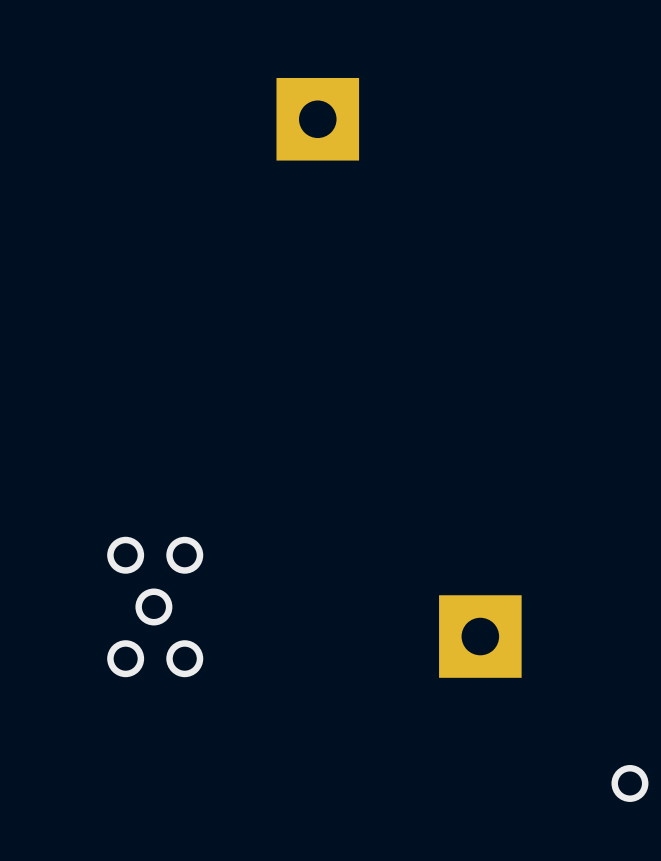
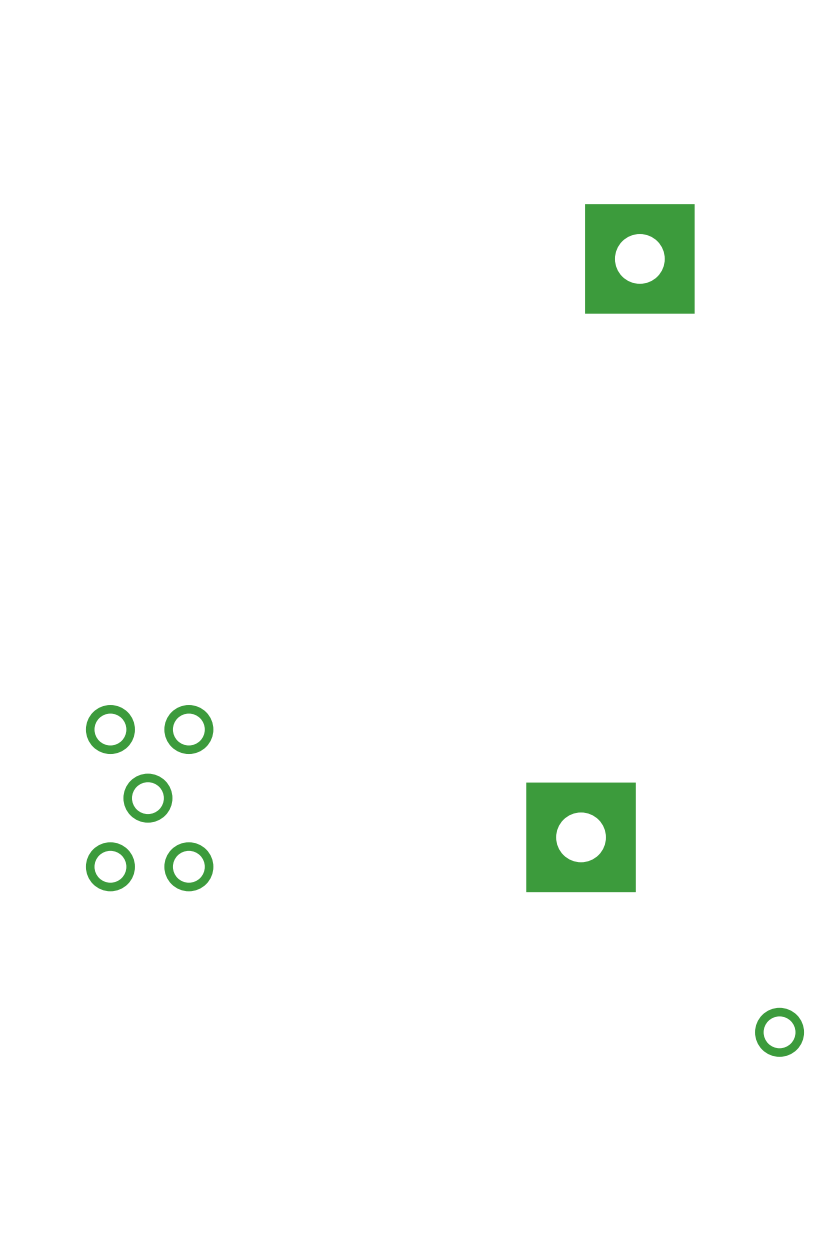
part position: (317, 119) -> (639, 258)

